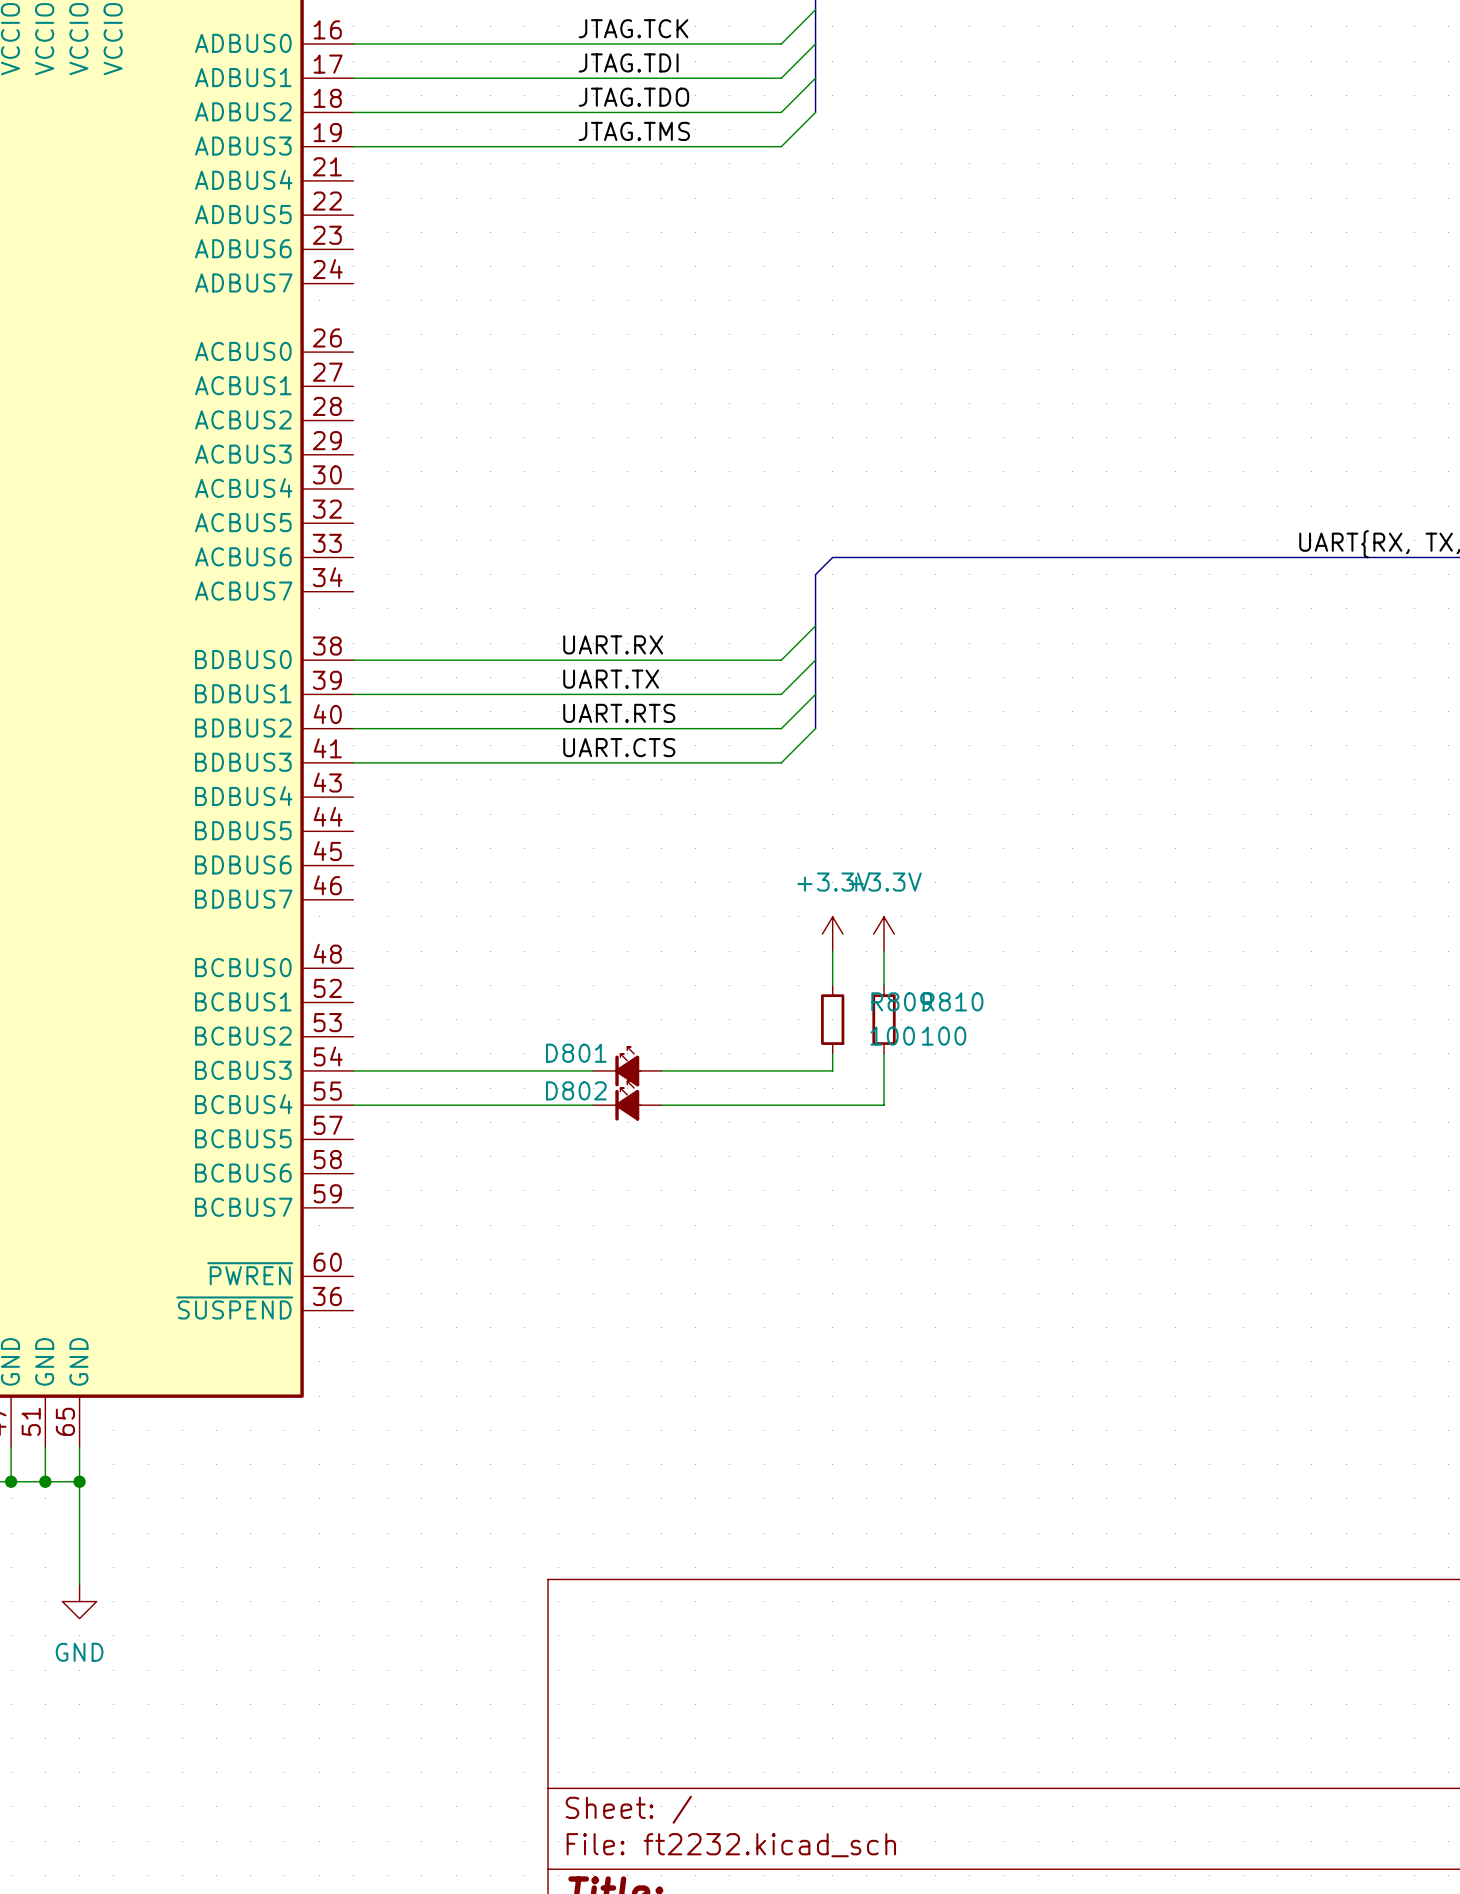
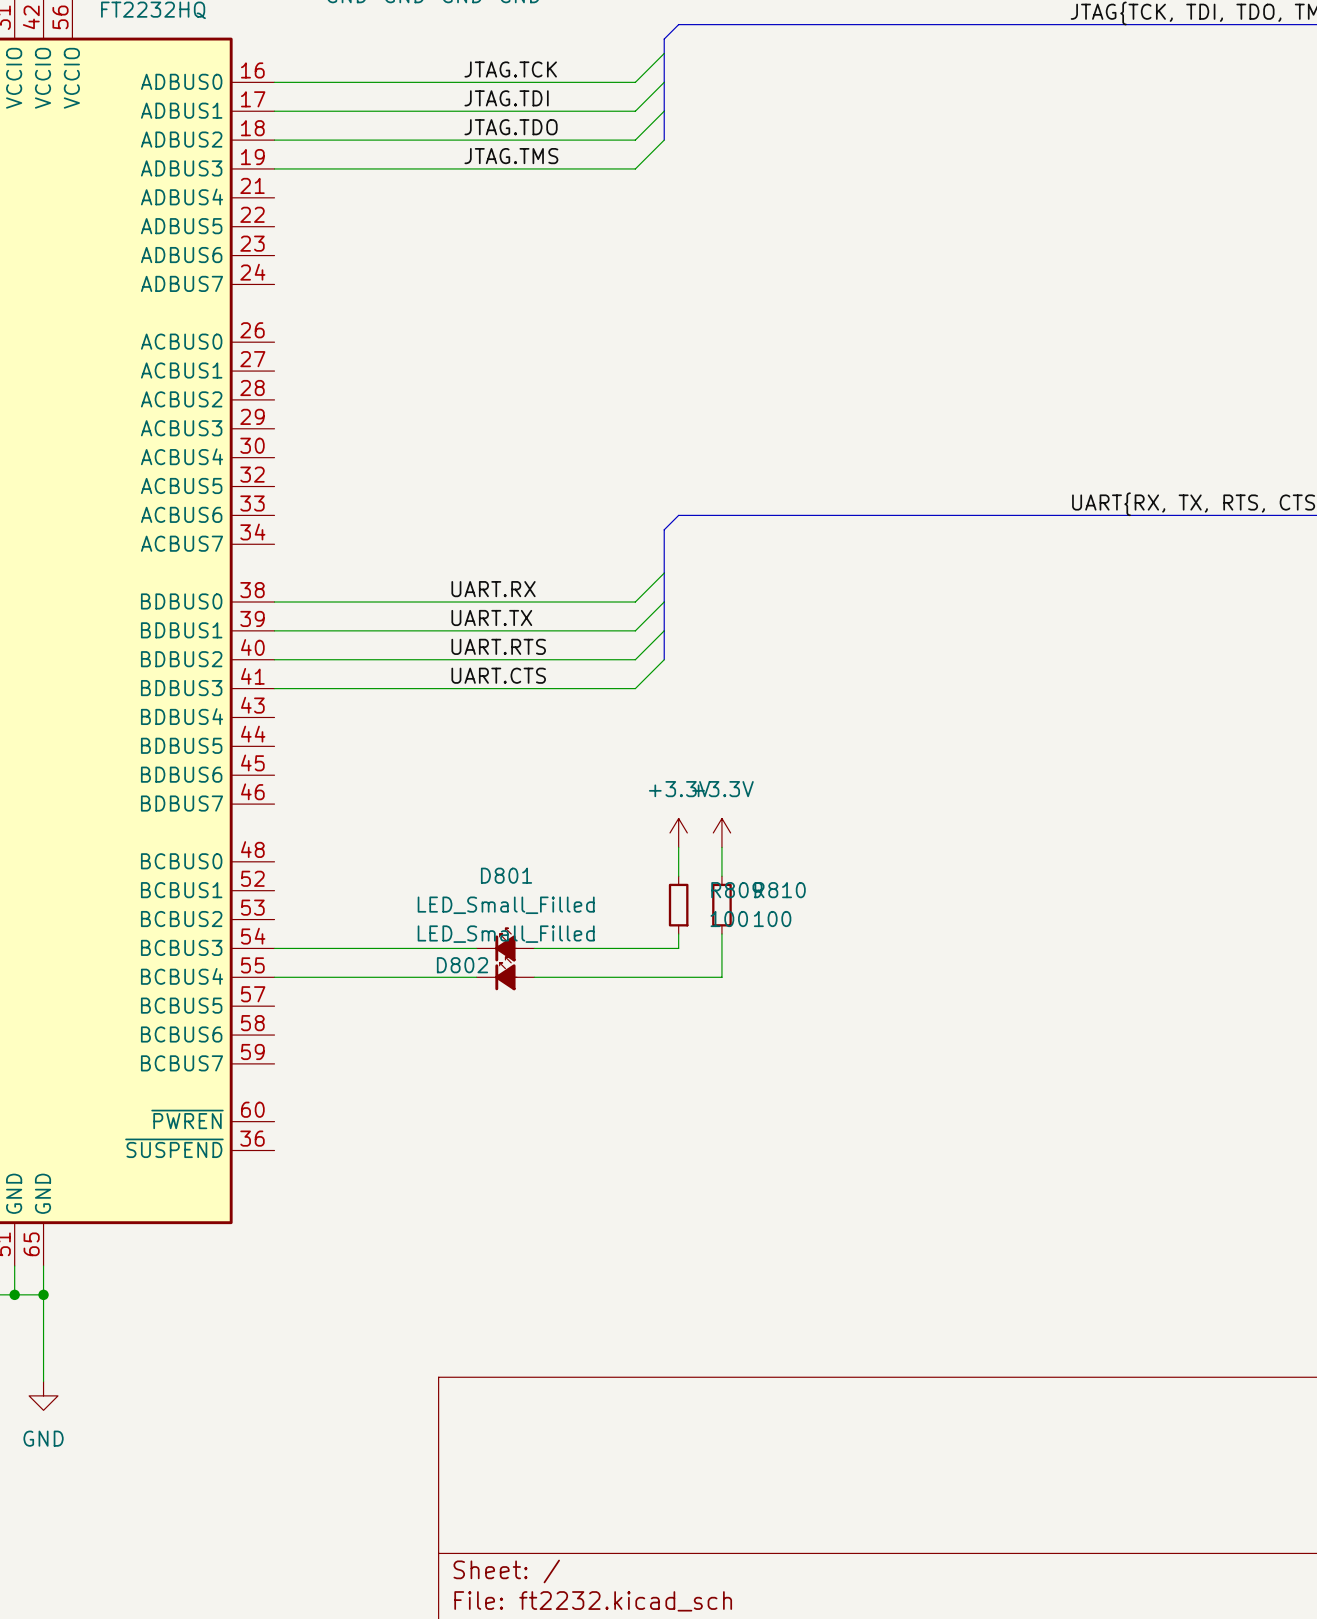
D801 value: none -> LED_Small_Filled (506, 905)
D801 name position: D801 (576, 1053) -> D801 (506, 875)
D802 value: none -> LED_Small_Filled (506, 934)

